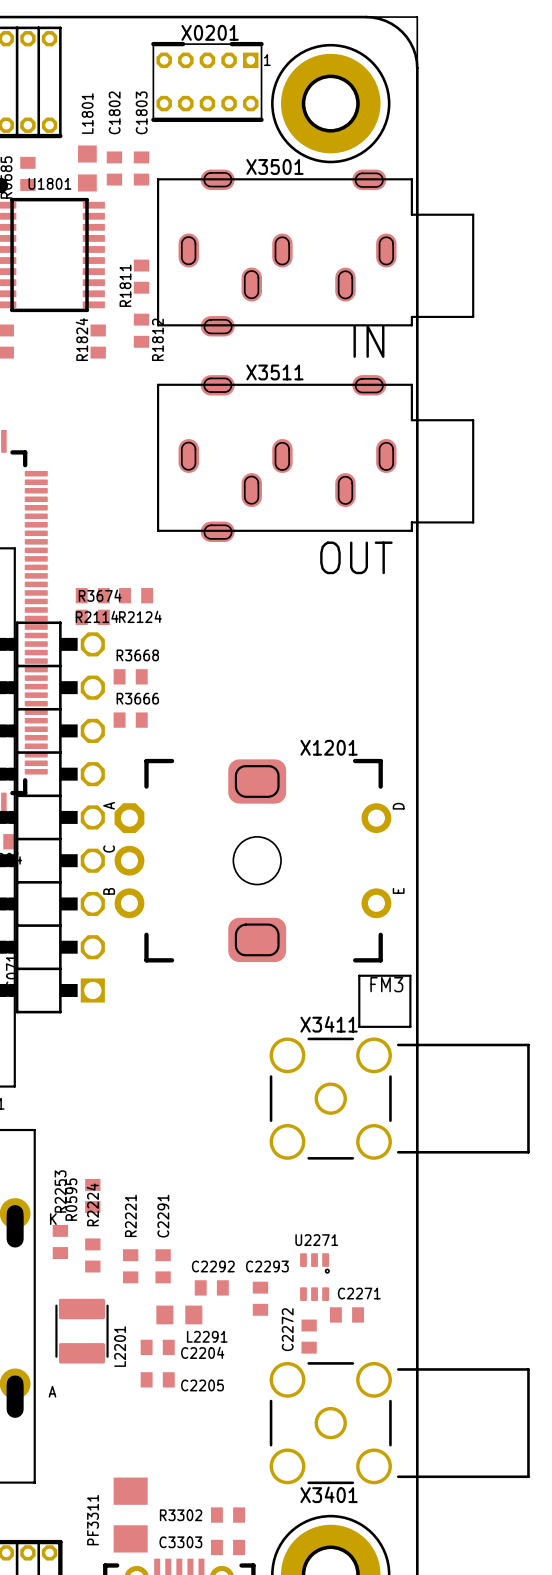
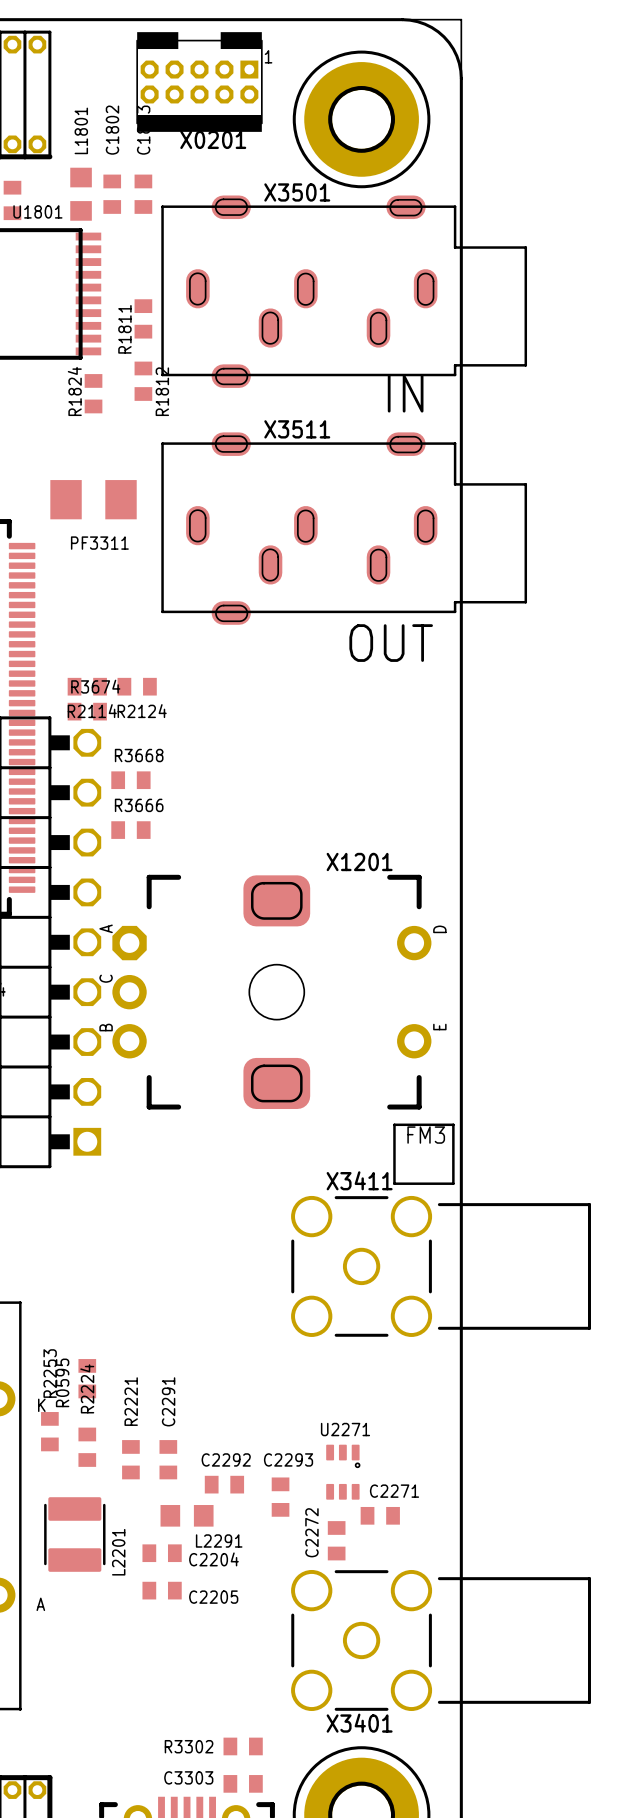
X0201 name position: X0201 (210, 32) -> X0201 (213, 139)
X0201 footprint: [151, 41, 264, 122] -> [136, 32, 263, 132]
PF3311 rotation: 0° (130, 1515) -> 90° clockwise (93, 499)
PF3311 position: (130, 1515) -> (93, 499)
PF3311 name position: PF3311 (93, 1520) -> PF3311 (99, 543)

